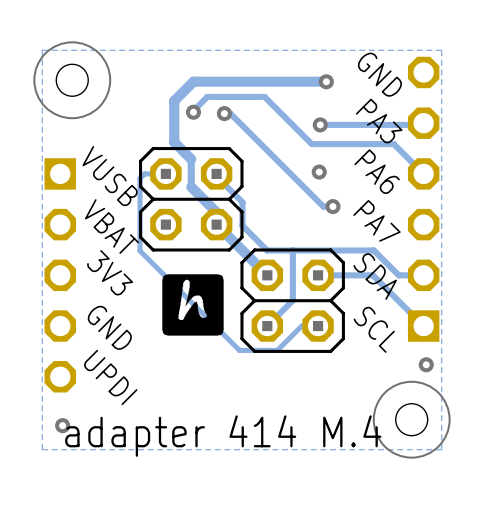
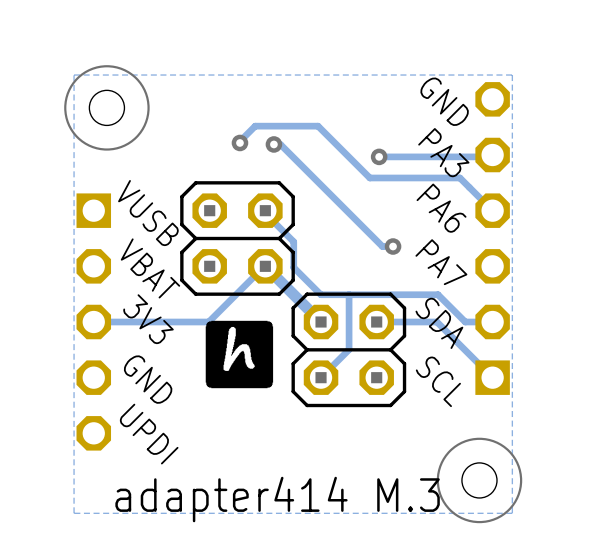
track: (326, 81) (193, 81) (174, 100) (174, 142) (191, 159) (191, 187) (216, 212) (216, 224) -> none
via: (326, 81) -> none
via: (319, 172) -> none
track: (165, 173) (144, 173) (140, 178) (140, 250) (239, 350) (277, 350) (301, 326) (318, 326) -> none
track: none -> (264, 266) (208, 322) (93, 322)
via: (426, 364) -> none
via: (62, 425) -> none
text: adapter 414 M.4 (223, 436) -> adapter414 M.3 (277, 499)

